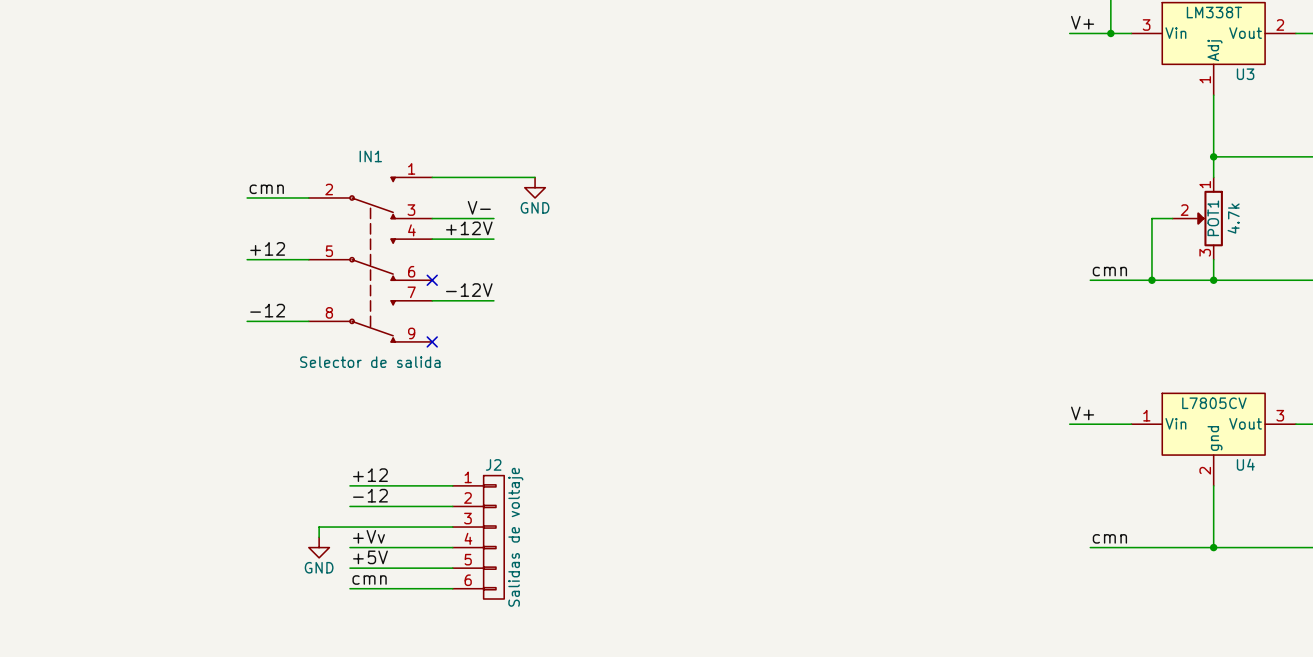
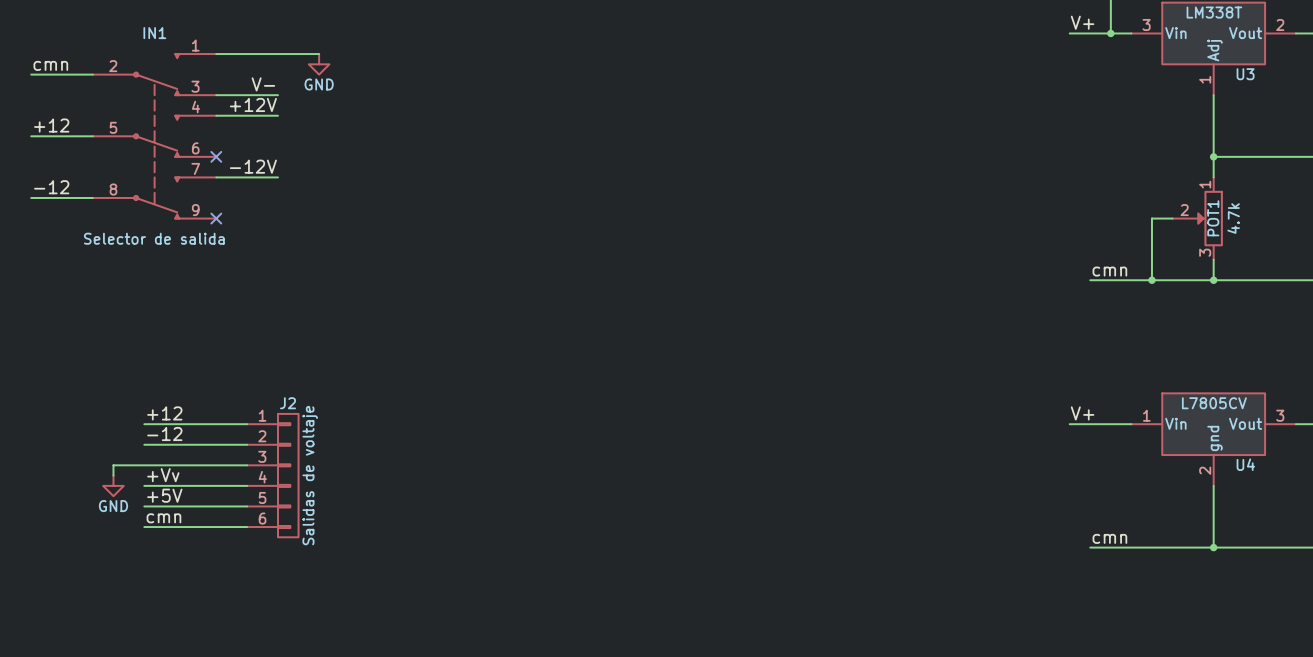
wire: none -> (216, 54) (319, 54)
power symbol: none -> GND (319, 64)
label: none -> cmn (50, 65)
wire: none -> (31, 74) (92, 74)
label: none -> V- (263, 84)
wire: none -> (216, 95) (277, 95)
label: none -> +12V (253, 104)
label: none -> +12 (51, 125)
wire: none -> (31, 136) (92, 136)
no-connect mark: none -> (216, 156)
label: none -> -12V (253, 166)
wire: (432, 177) (535, 177) -> none
label: none -> -12 (51, 187)
power symbol: GND (535, 187) -> none
label: cmn (266, 189) -> none
wire: none -> (31, 197) (92, 197)
wire: (247, 197) (308, 197) -> (216, 115) (277, 115)
label: V- (479, 207) -> none
no-connect mark: none -> (216, 218)
wire: (432, 218) (493, 218) -> none
label: +12V (469, 228) -> none
wire: (432, 239) (493, 239) -> none
label: +12 (267, 248) -> none
wire: (247, 259) (308, 259) -> (216, 177) (277, 177)
IN1 position: (370, 259) -> (154, 136)
no-connect mark: (432, 280) -> none
label: -12V (469, 290) -> none
wire: (432, 300) (493, 300) -> none
label: -12 (267, 310) -> none
wire: (247, 321) (308, 321) -> none
no-connect mark: (432, 341) -> none
label: none -> +12 (164, 413)
wire: none -> (144, 424) (247, 424)
label: none -> -12 (164, 434)
wire: none -> (144, 444) (247, 444)
wire: none -> (247, 465) (113, 465) (113, 475)
label: none -> +Vv (163, 475)
label: +12 (370, 475) -> none
power symbol: none -> GND (113, 485)
wire: none -> (144, 485) (247, 485)
wire: (349, 485) (452, 485) -> none
label: none -> +5V (164, 495)
label: -12 (370, 495) -> none
wire: none -> (144, 506) (247, 506)
wire: (349, 506) (452, 506) -> none
label: none -> cmn (163, 518)
wire: none -> (144, 527) (247, 527)
wire: (452, 527) (319, 527) (319, 537) -> none
label: +Vv (368, 536) -> none
J2 position: (478, 537) -> (272, 475)
power symbol: GND (319, 547) -> none
wire: (349, 547) (452, 547) -> none
label: +5V (370, 557) -> none
wire: (349, 568) (452, 568) -> none
label: cmn (369, 580) -> none
wire: (349, 588) (452, 588) -> none

